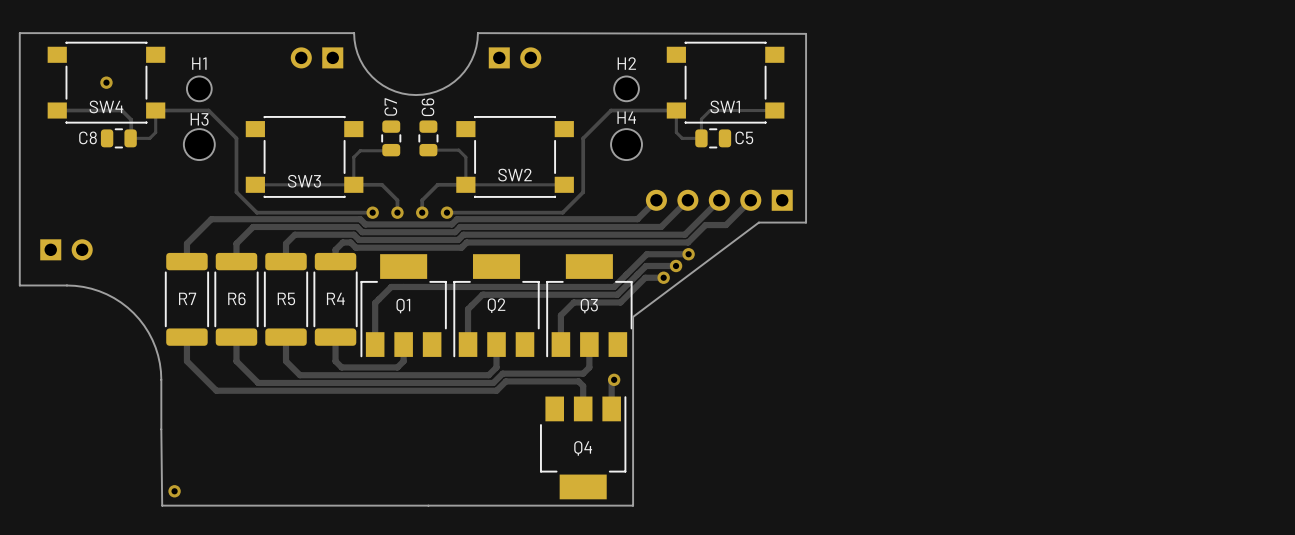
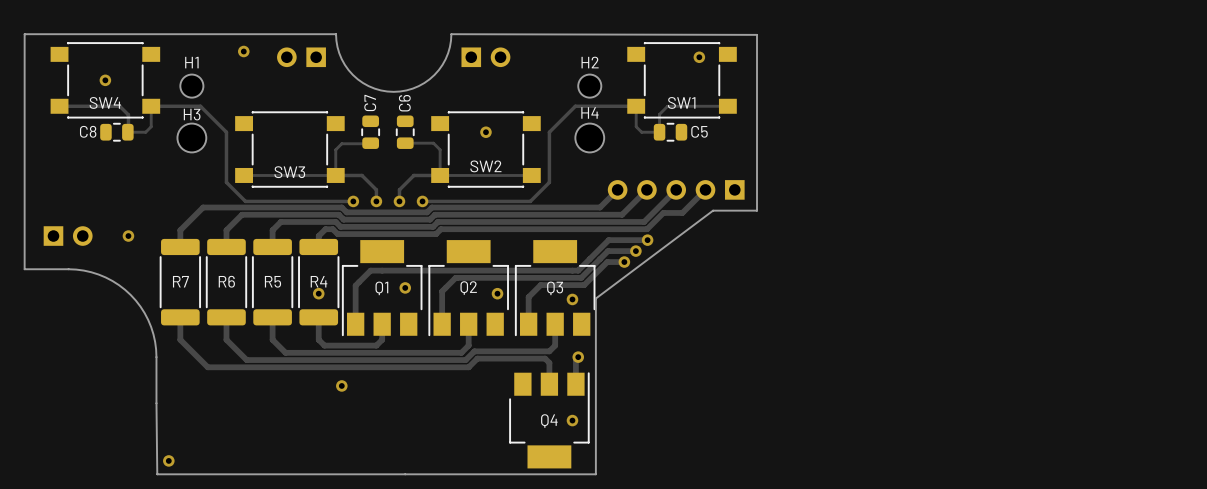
via: none -> (243, 51)
via: none -> (699, 57)
via: none -> (485, 132)
via: none -> (128, 236)
via: none -> (405, 287)
via: none -> (318, 293)
via: none -> (497, 293)
via: none -> (572, 299)
via: none -> (341, 385)
via: none -> (572, 420)

